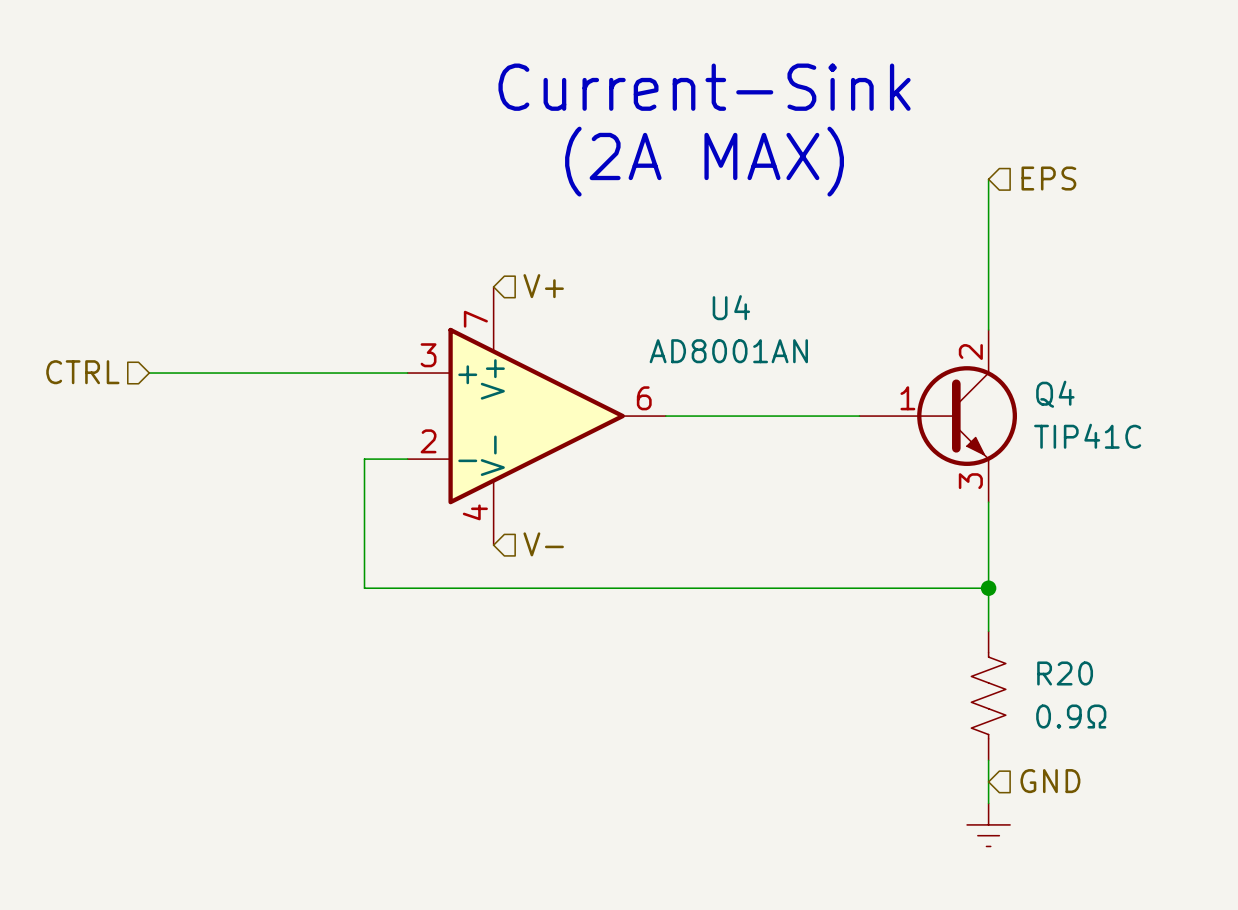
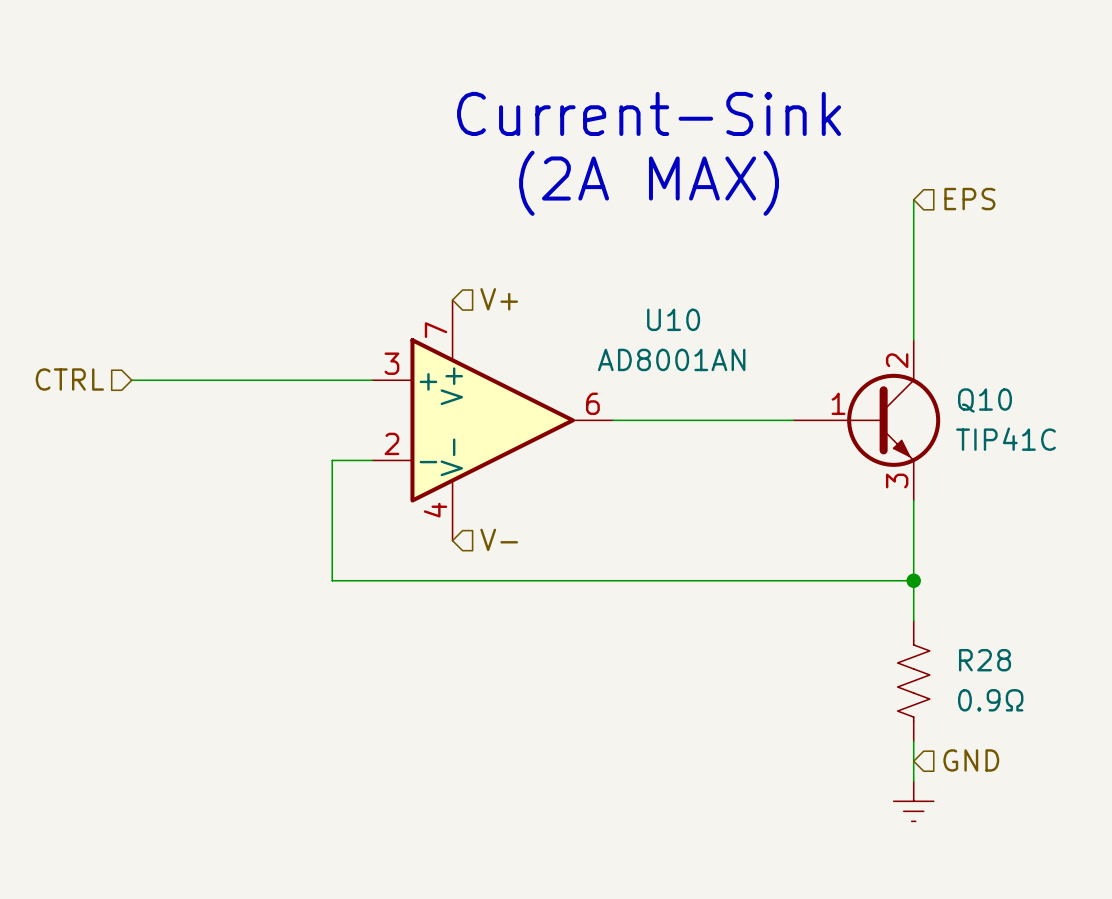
U4 name: U4 (731, 307) -> U10 (673, 319)
Q4 name: Q4 (1055, 394) -> Q10 (984, 400)
R20 name: R20 (1065, 673) -> R28 (984, 660)

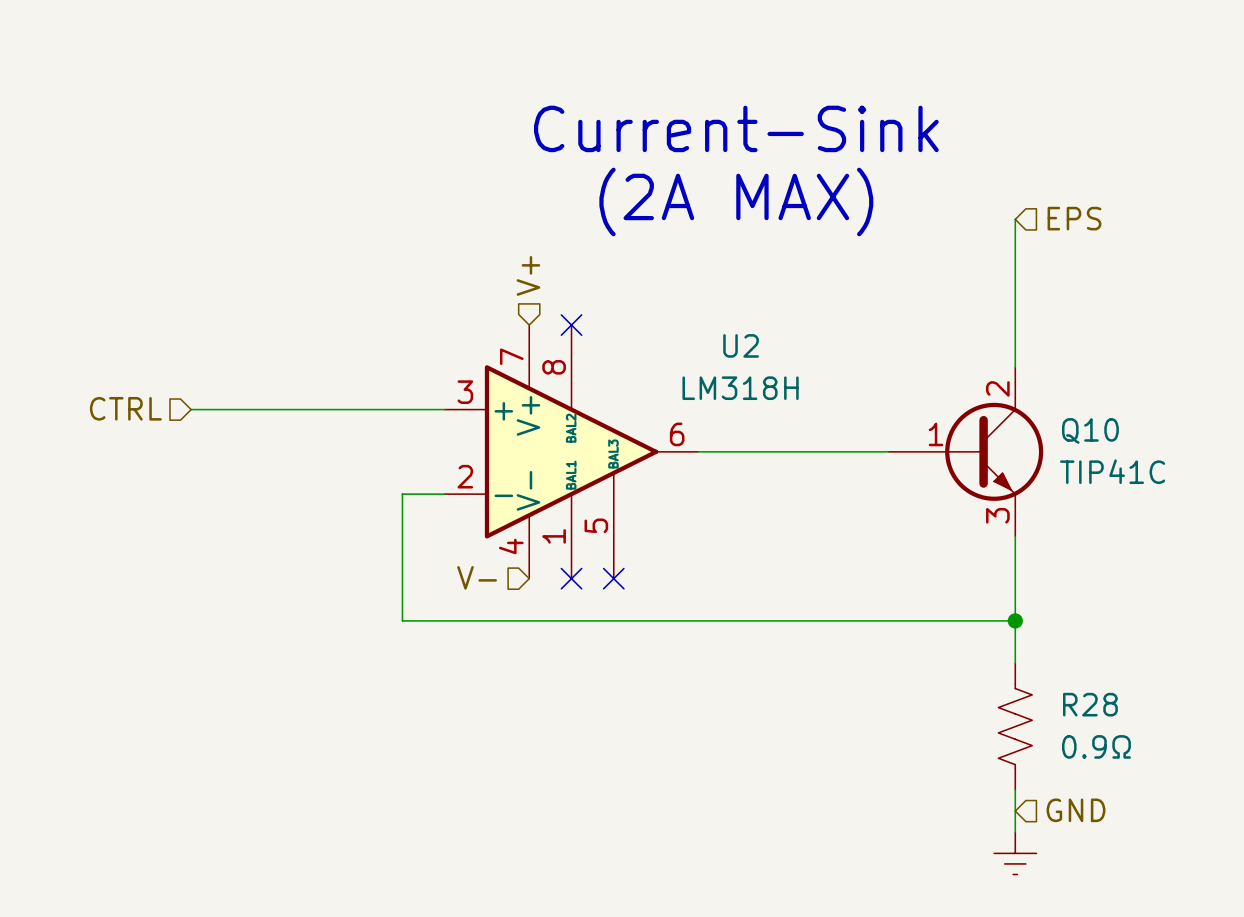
hierarchical label rotation: 0° (499, 299) -> 90° counterclockwise (528, 275)
hierarchical label position: V+ (499, 299) -> V+ (528, 275)
no-connect mark: none -> (571, 325)
U10: AD8001AN (492, 420) -> none
U2: none -> LM318H (571, 451)
hierarchical label rotation: 0° (499, 539) -> 180° (477, 577)
hierarchical label position: V- (499, 539) -> V- (477, 577)
no-connect mark: none -> (571, 578)
no-connect mark: none -> (613, 578)

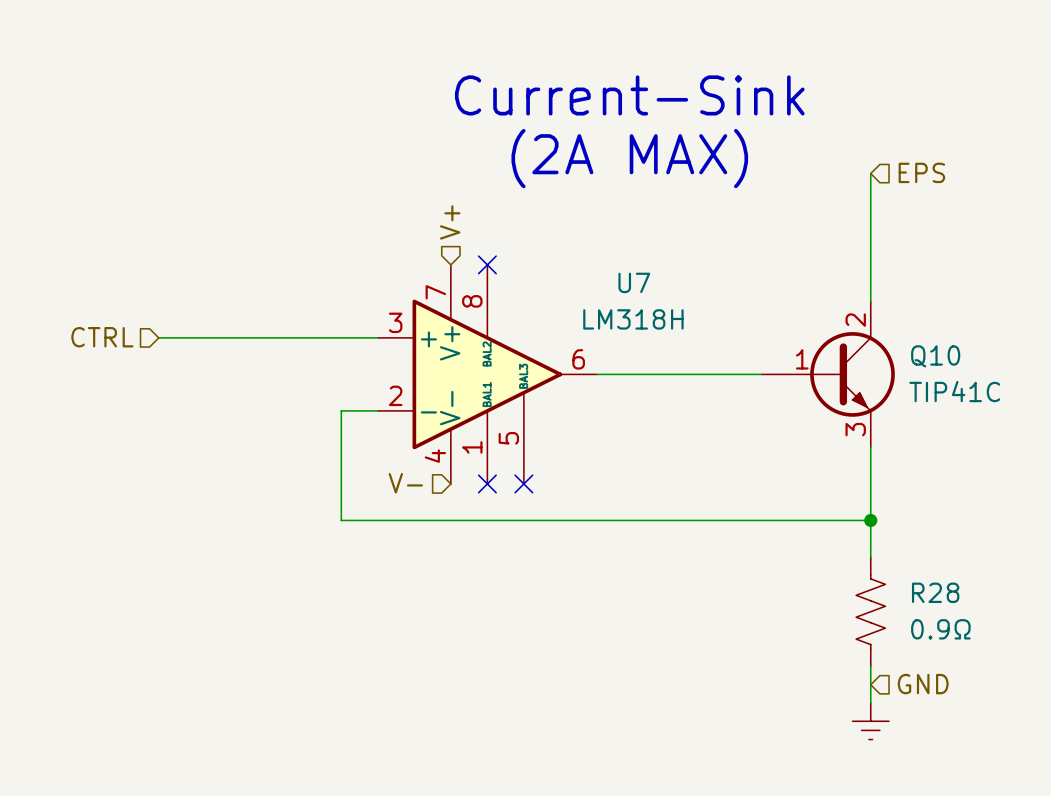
U2 name: U2 (741, 345) -> U7 (634, 282)

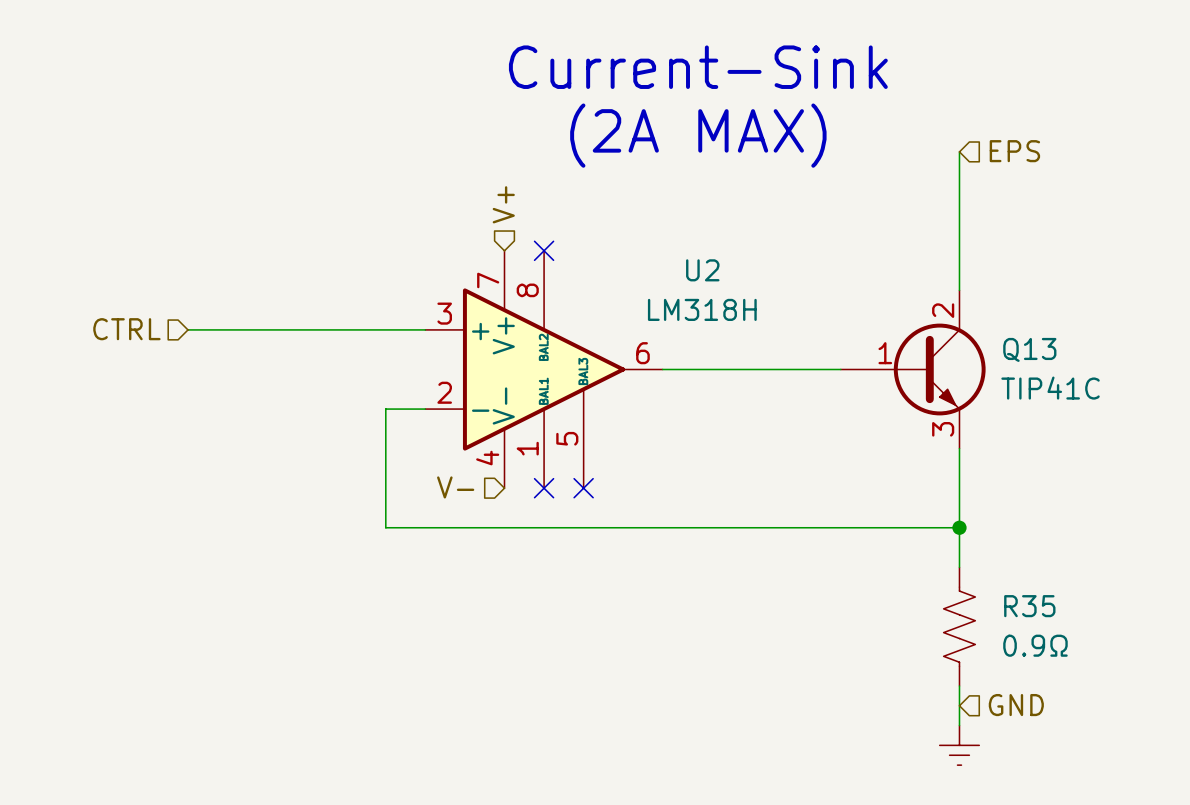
U7 name: U7 (634, 282) -> U2 (702, 270)
Q10 name: Q10 (935, 356) -> Q13 (1029, 349)
R28 name: R28 (935, 592) -> R35 (1029, 606)

